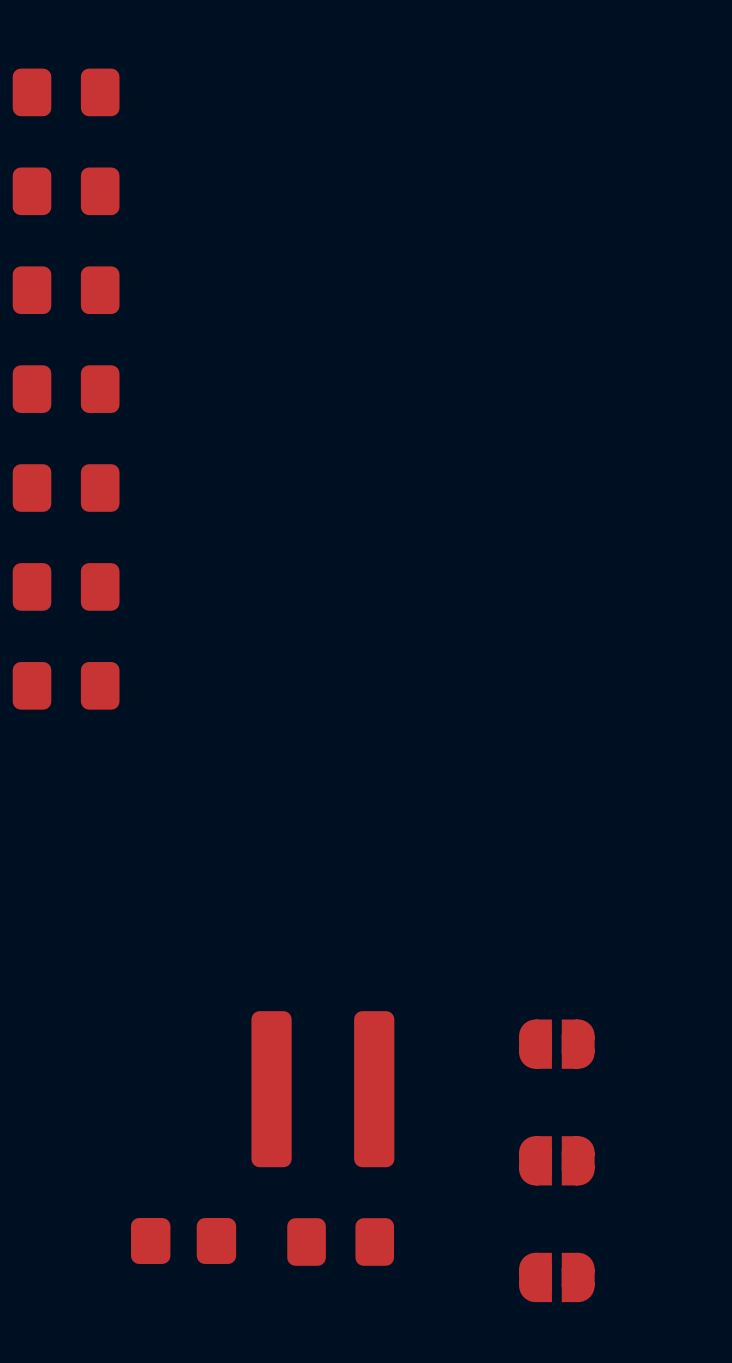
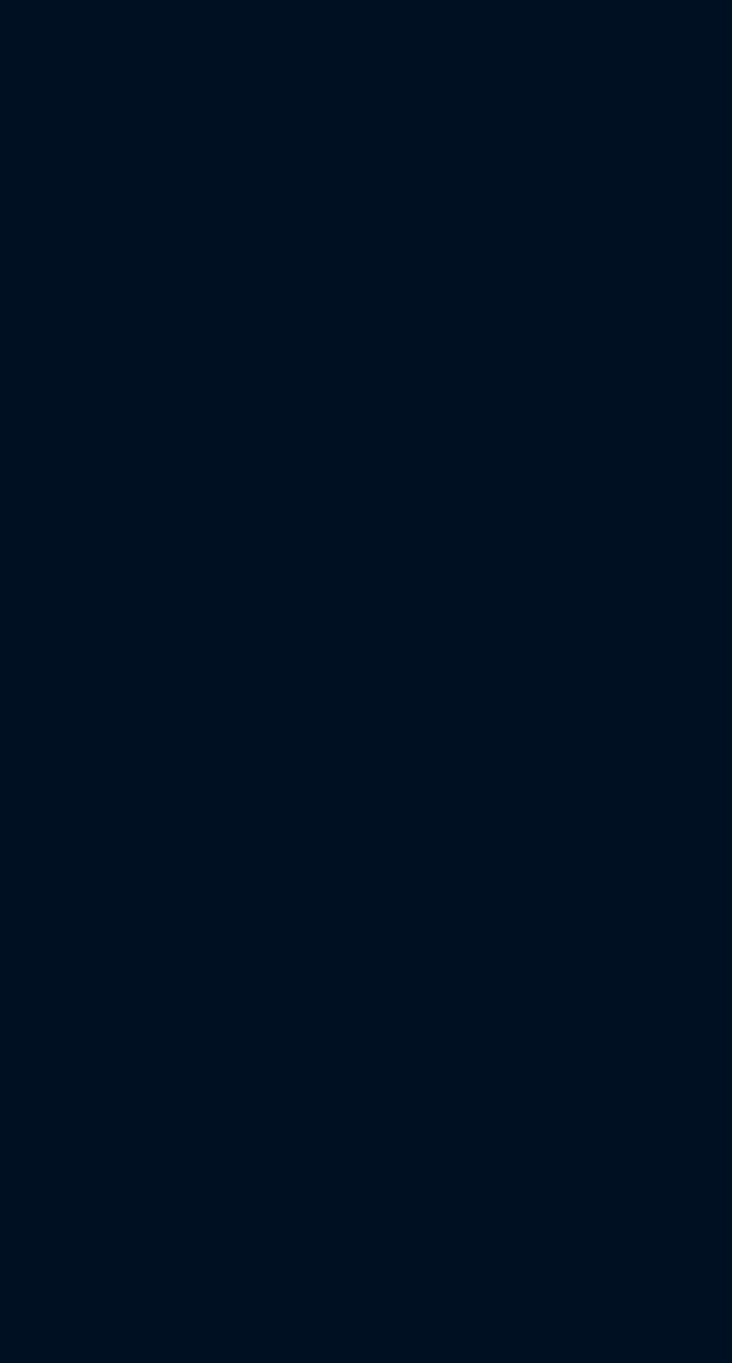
part: (66, 92) -> none
part: (66, 191) -> none
part: (66, 290) -> none
part: (66, 389) -> none
part: (66, 488) -> none
part: (66, 586) -> none
part: (66, 685) -> none
part: (556, 1044) -> none
part: (322, 1089) -> none
part: (556, 1160) -> none
part: (183, 1240) -> none
part: (340, 1241) -> none
part: (556, 1277) -> none

